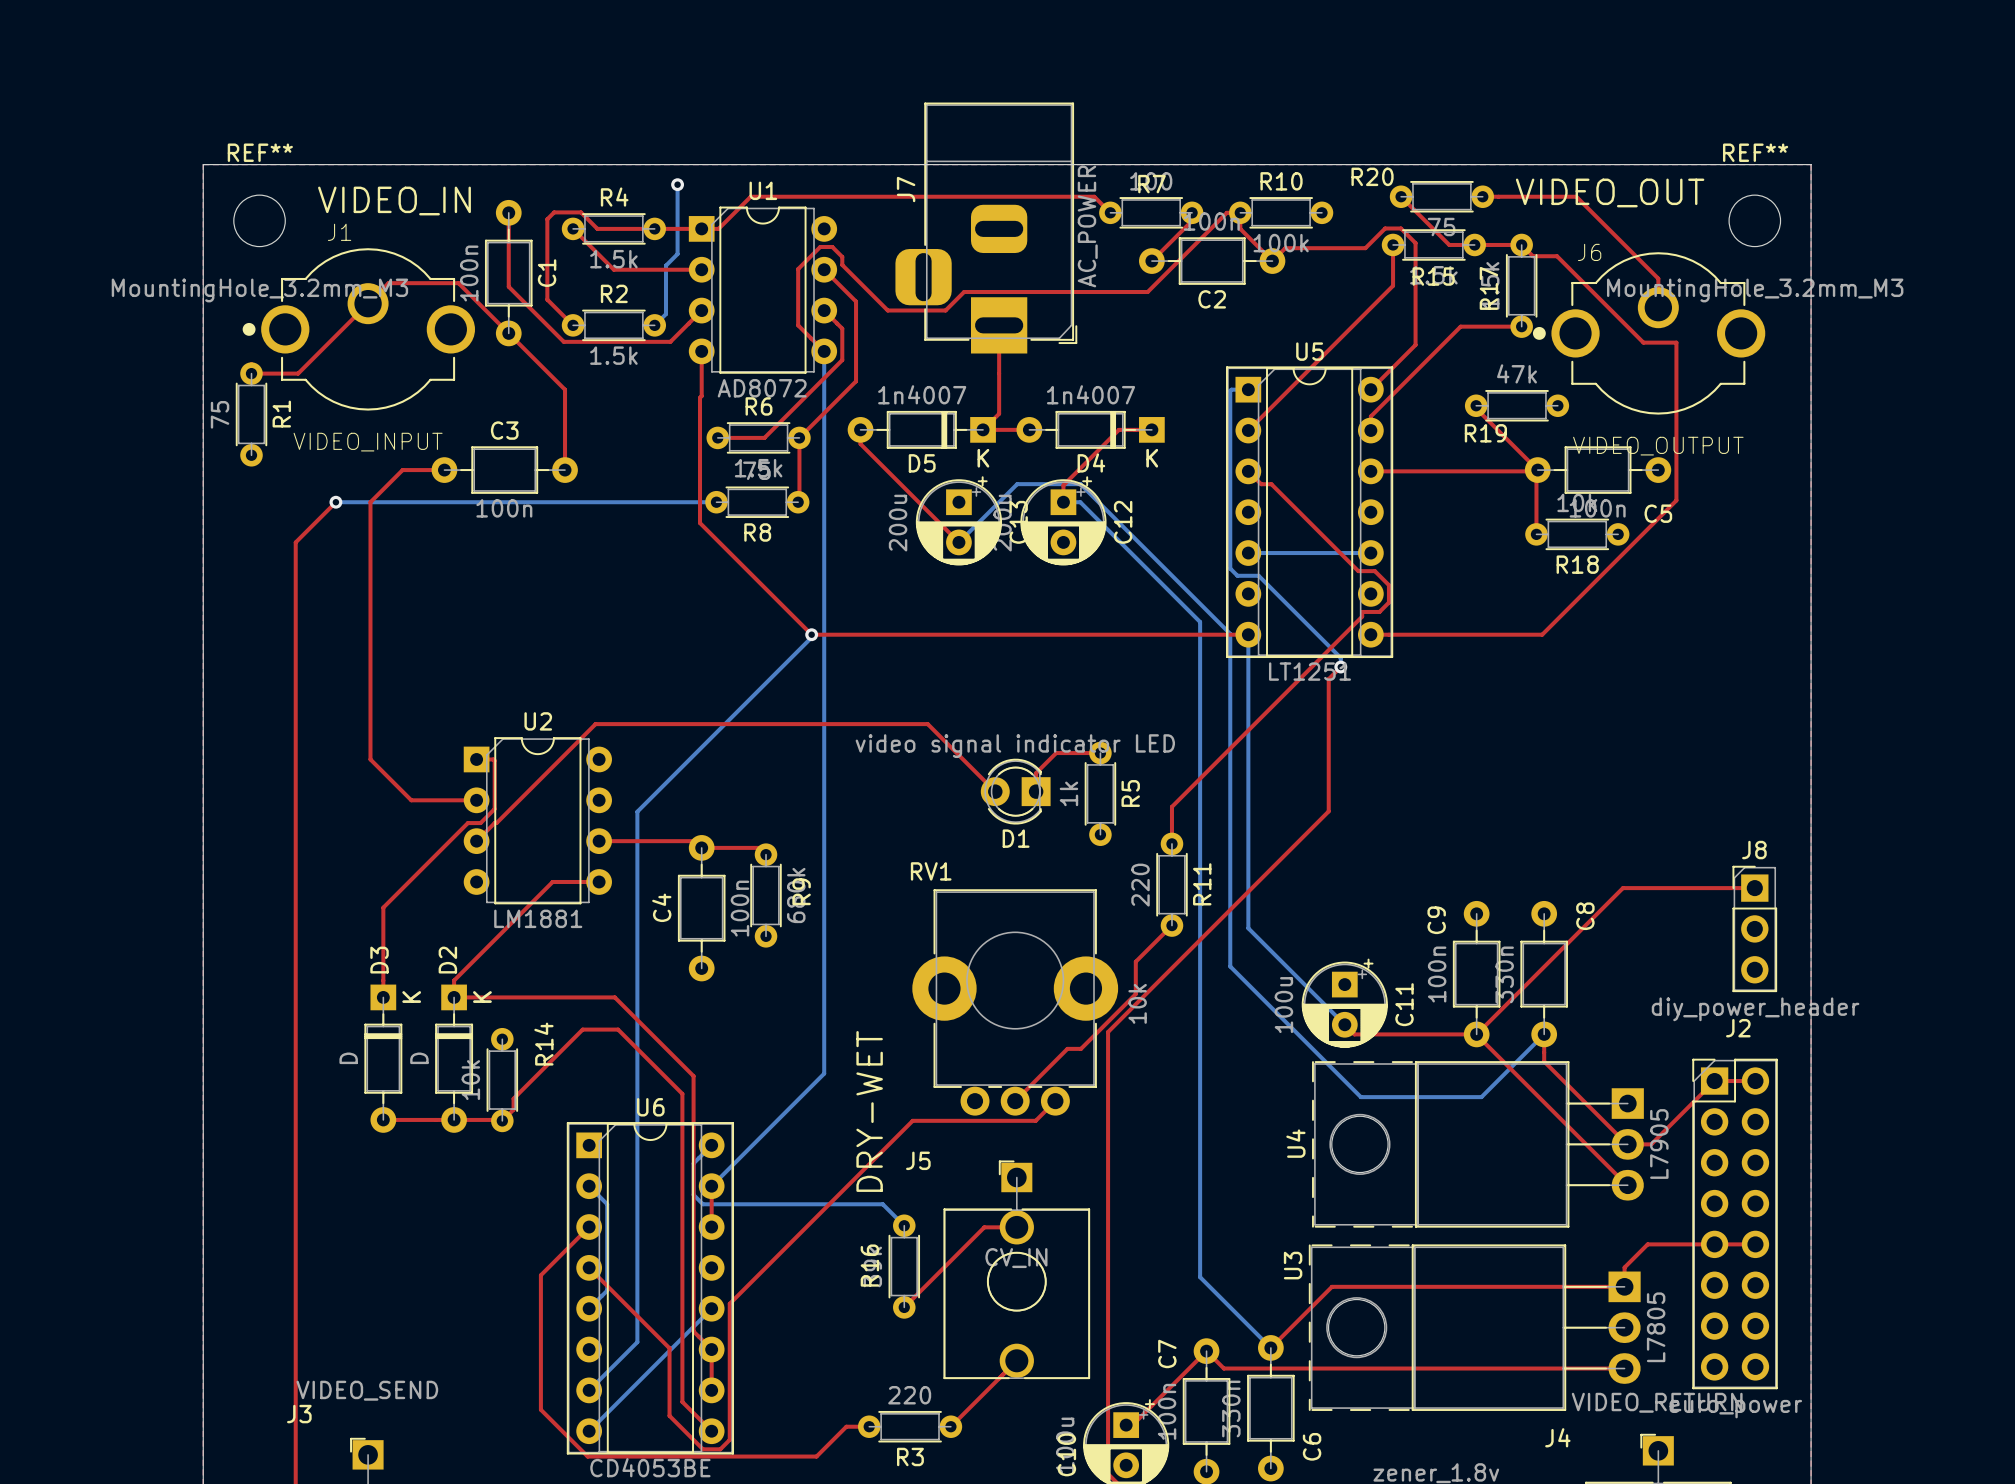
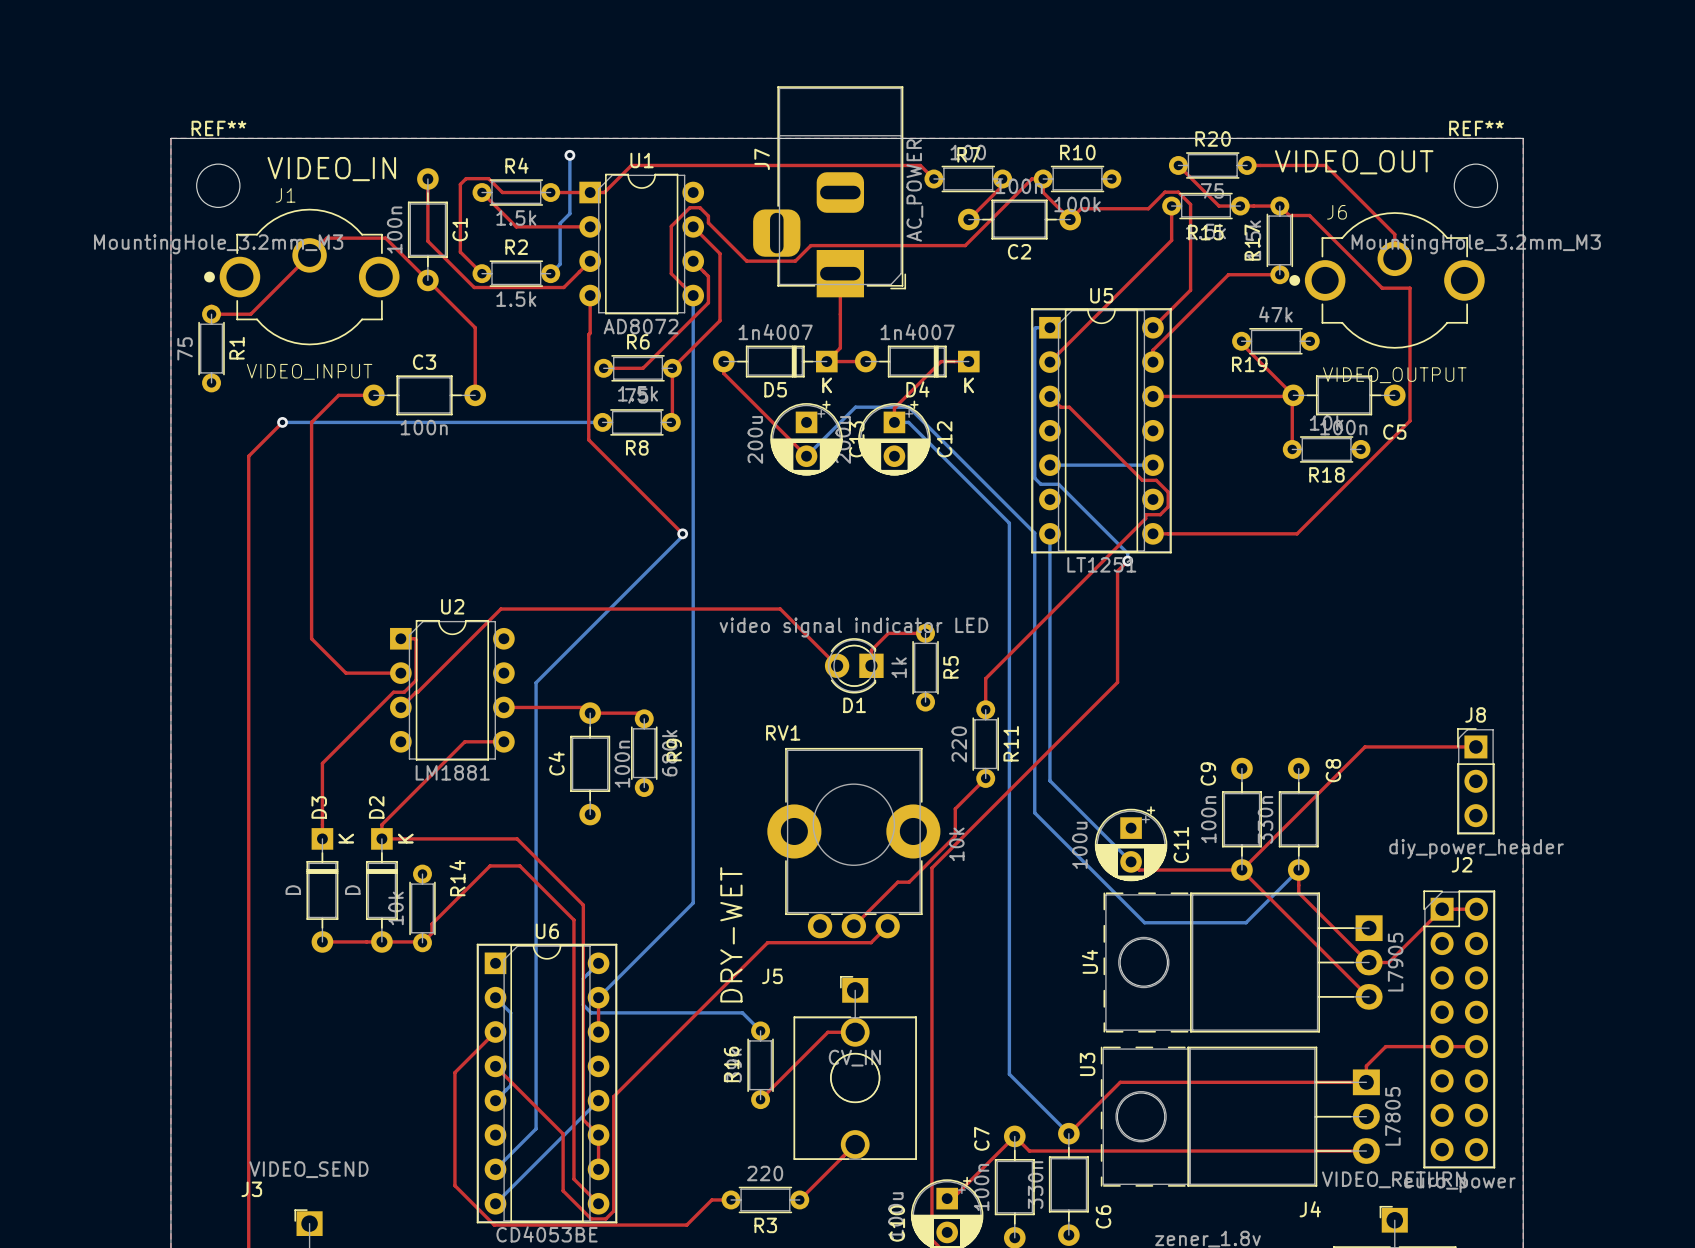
R20 name position: R20 (1372, 176) -> R20 (1213, 139)
top track: (811, 634) (1248, 634) -> none

